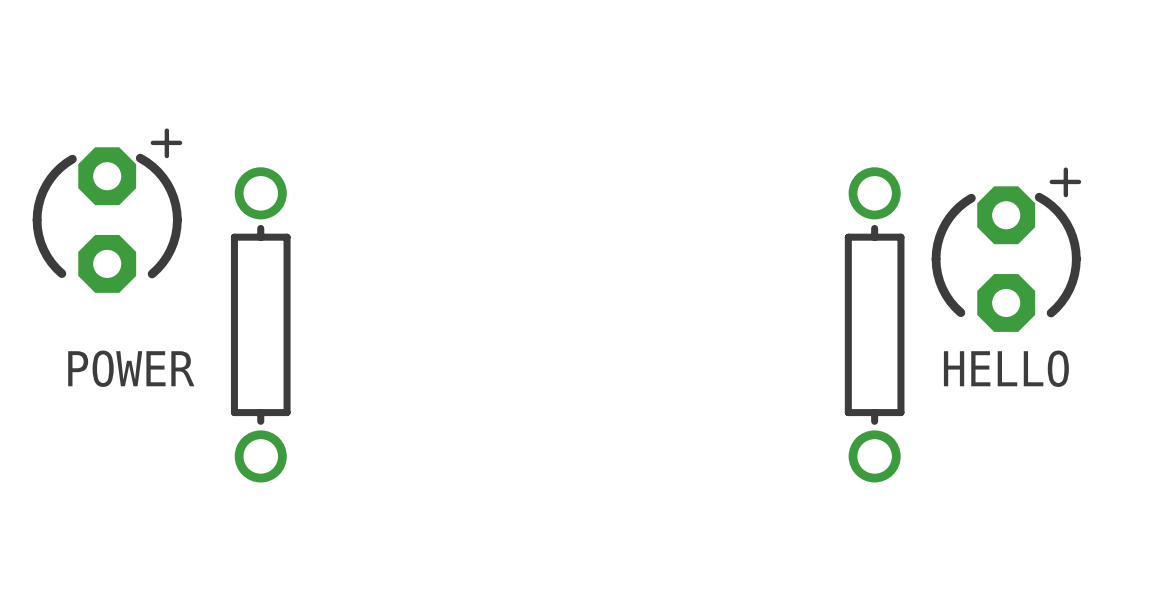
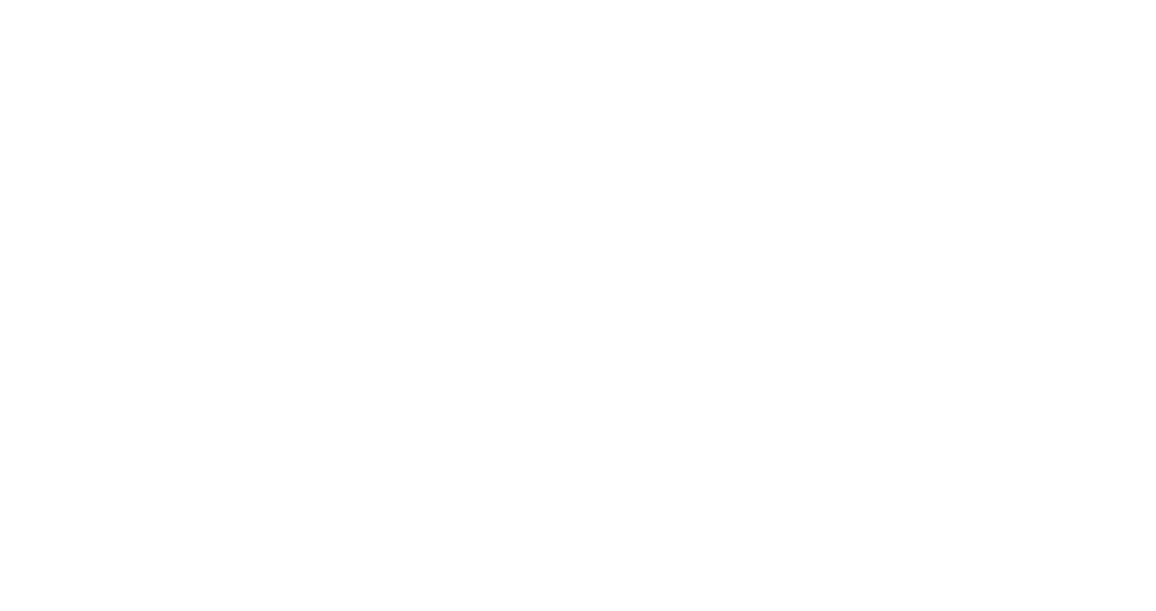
part: (107, 210) -> none
part: (1006, 249) -> none
part: (260, 324) -> none
part: (874, 324) -> none
text: POWER (131, 368) -> none
text: HELLO (1006, 368) -> none

